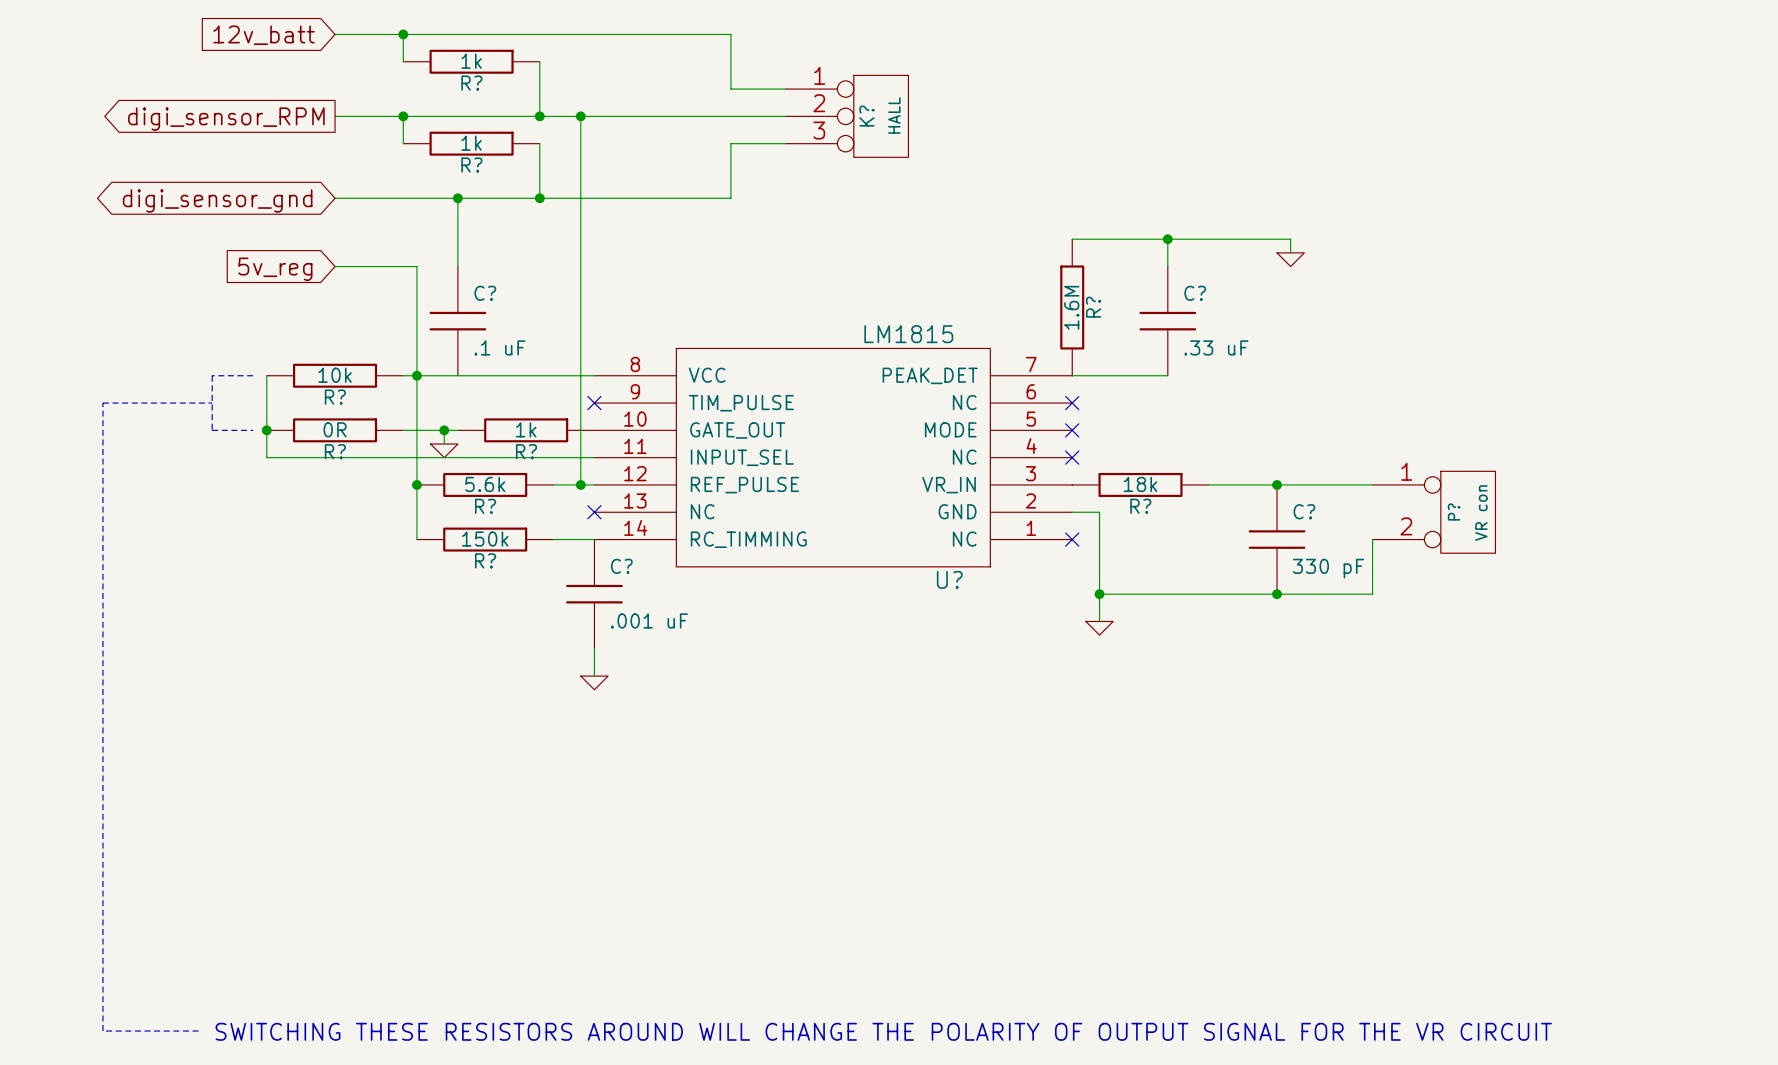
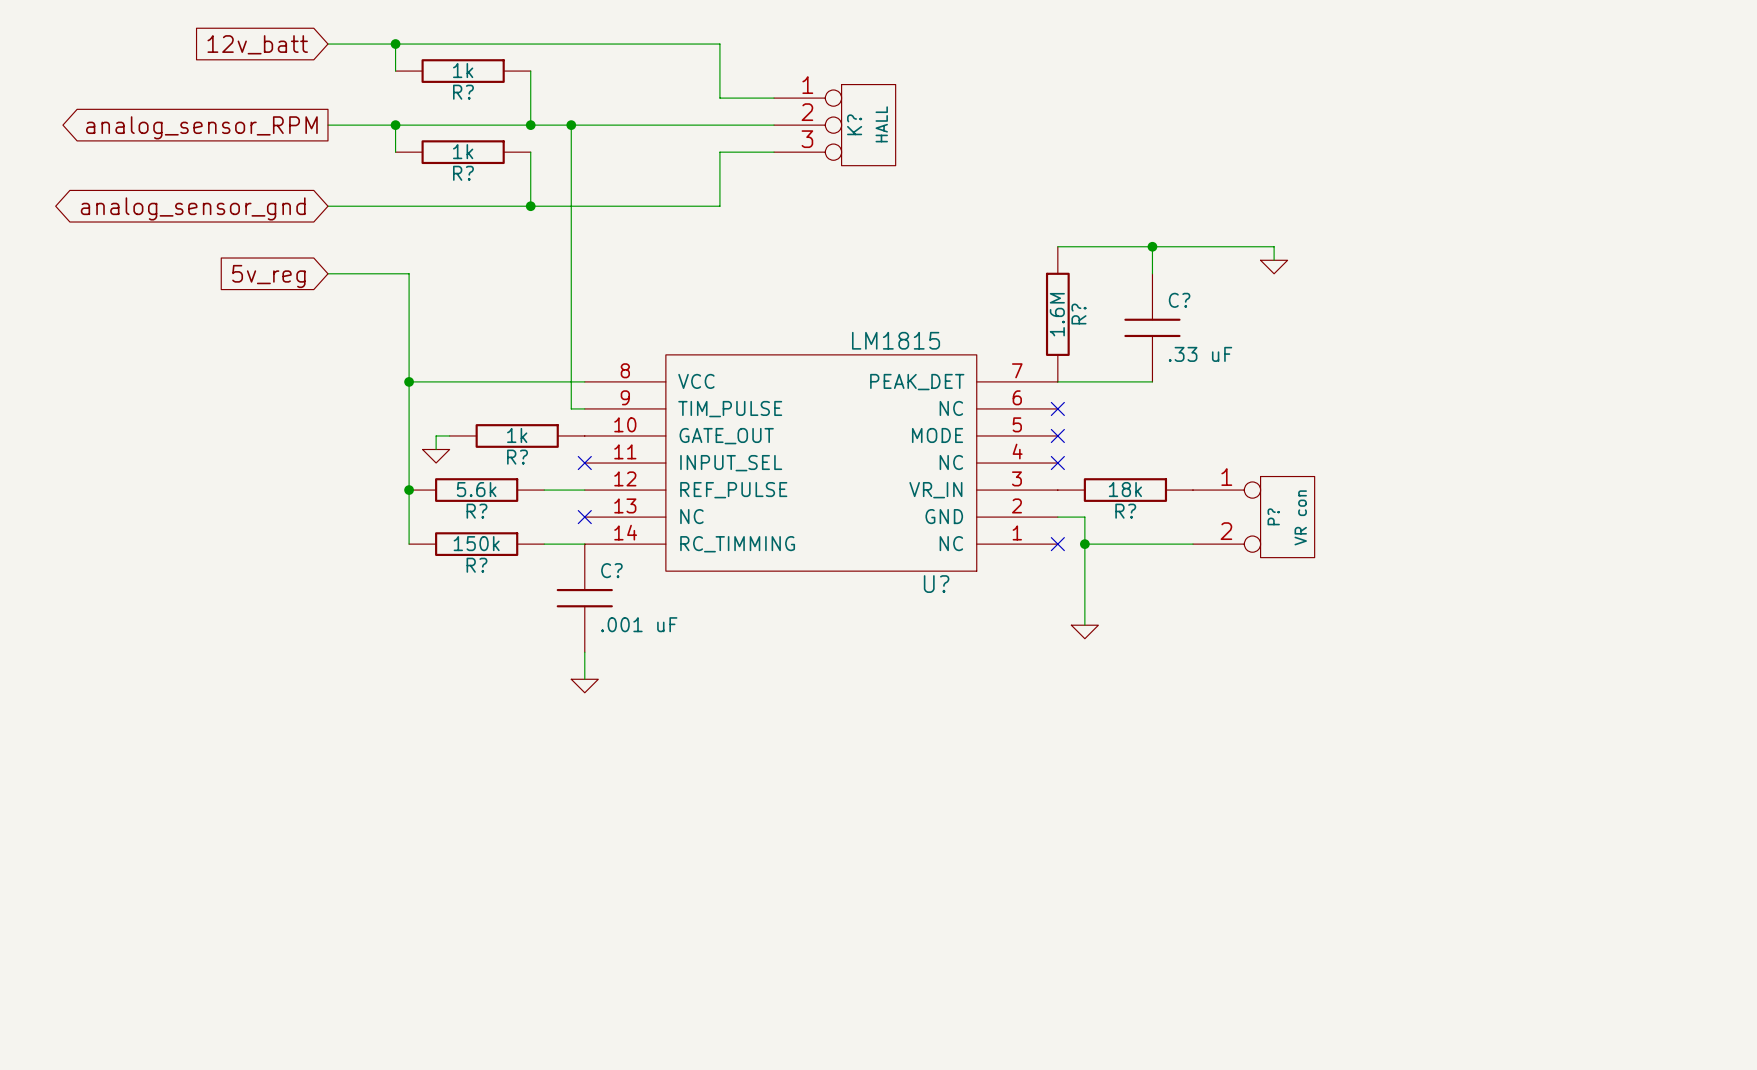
global label: digi_sensor_RPM (226, 119) -> analog_sensor_RPM (201, 127)
wire: (457, 198) (457, 266) -> none
junction: (457, 198) -> none
global label: digi_sensor_gnd (217, 201) -> analog_sensor_gnd (193, 208)
C?: .1 uF (457, 321) -> none
line: (253, 375) (212, 375) (212, 430) (253, 430) -> none
wire: (266, 375) (266, 457) (594, 457) -> none
R?: 10k (335, 375) -> none
wire: (403, 375) (416, 375) -> none
line: (212, 403) (102, 403) (102, 1031) (198, 1031) -> none
wire: (580, 403) (580, 484) -> (571, 408) (584, 408)
no-connect mark position: (594, 403) -> (584, 463)
junction: (266, 430) -> none
R?: 0R (335, 430) -> none
wire: (403, 430) (444, 430) -> none
junction: (444, 430) -> none
junction: (580, 484) -> none
wire: (1208, 484) (1372, 484) -> none
junction: (1277, 484) -> none
P? position: (1434, 512) -> (1253, 517)
wire: none -> (1084, 544) (1193, 544)
C?: 330 pF (1277, 539) -> none
wire: (1372, 539) (1372, 594) (1099, 594) -> none
junction position: (1099, 594) -> (1084, 544)
junction: (1277, 594) -> none
text: SWITCHING THESE RESISTORS AROUND WILL CHANGE THE POLARITY OF OUTPUT SIGNAL FOR THE VR CIRCUIT (883, 1031) -> none

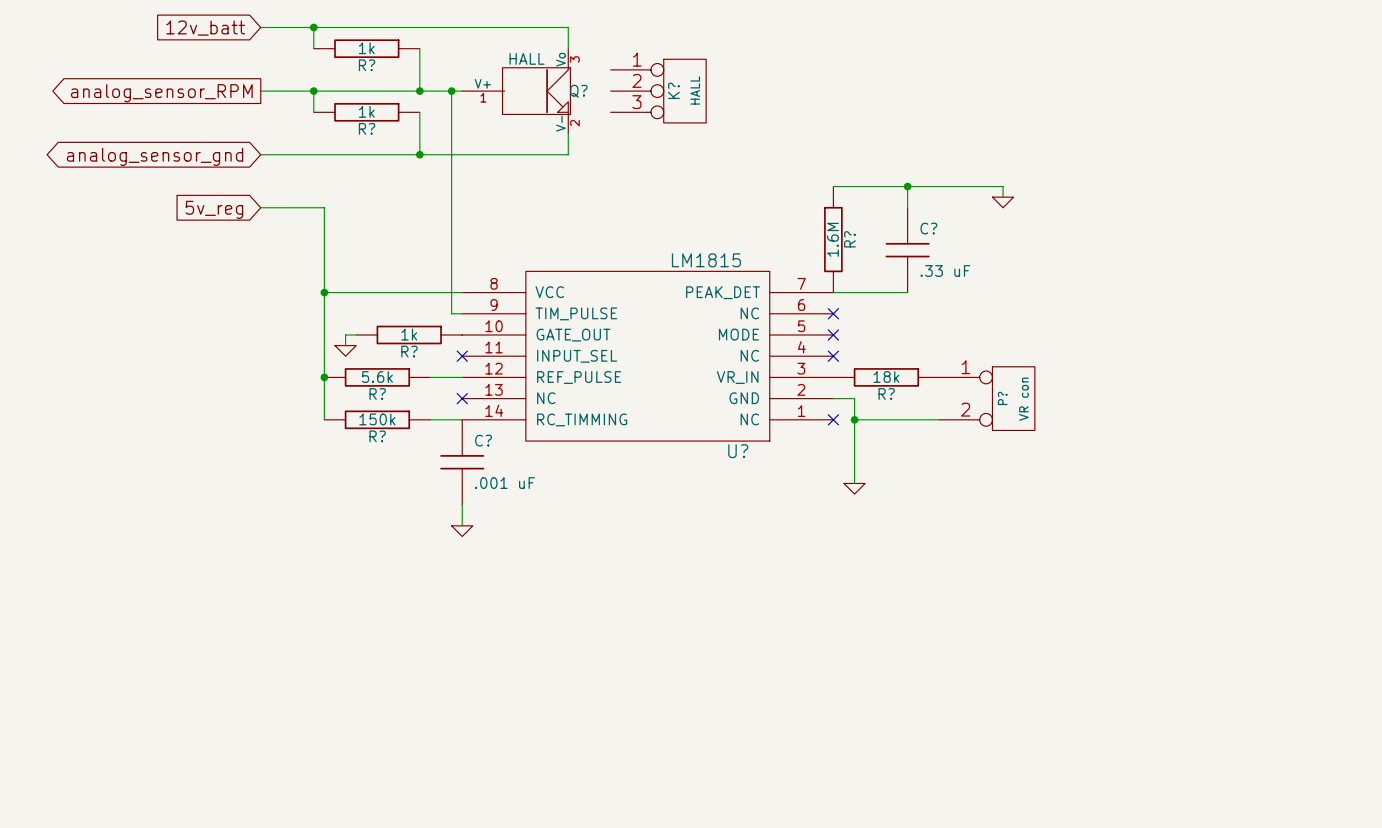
wire: (719, 71) (719, 98) (774, 98) -> none
wire: (584, 125) (774, 125) -> none
Q?: none -> HALL (516, 91)
wire: (774, 152) (719, 152) (719, 179) -> none

